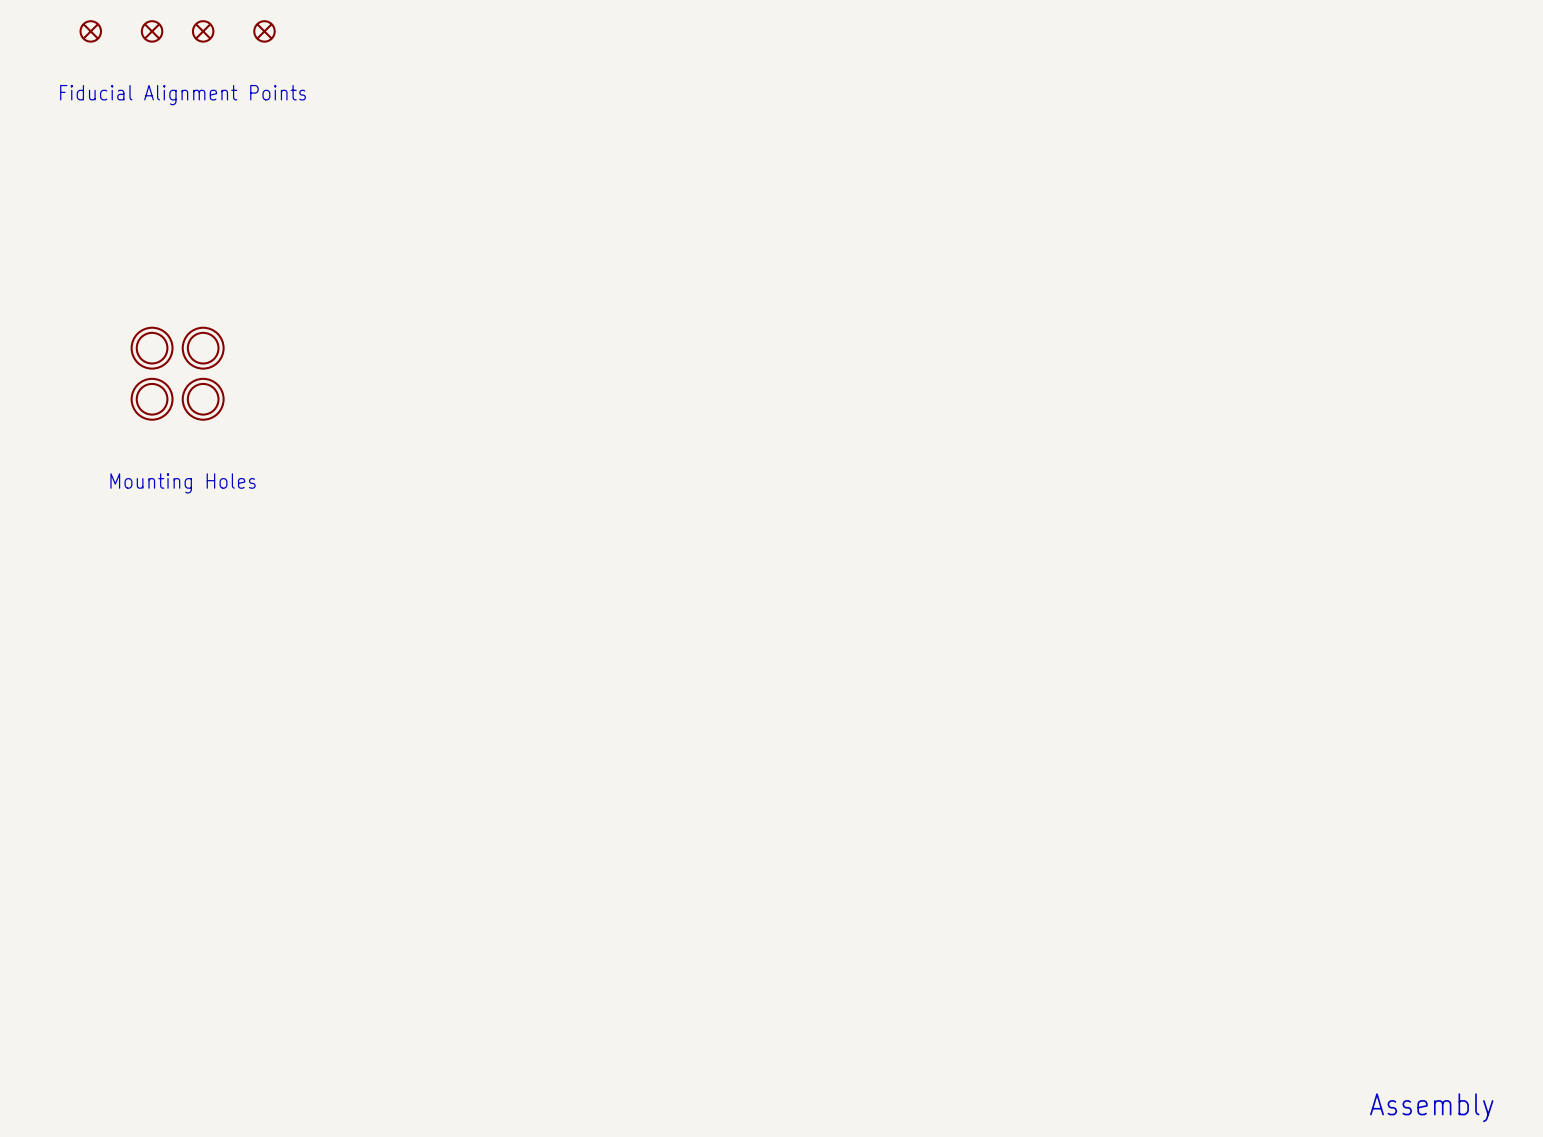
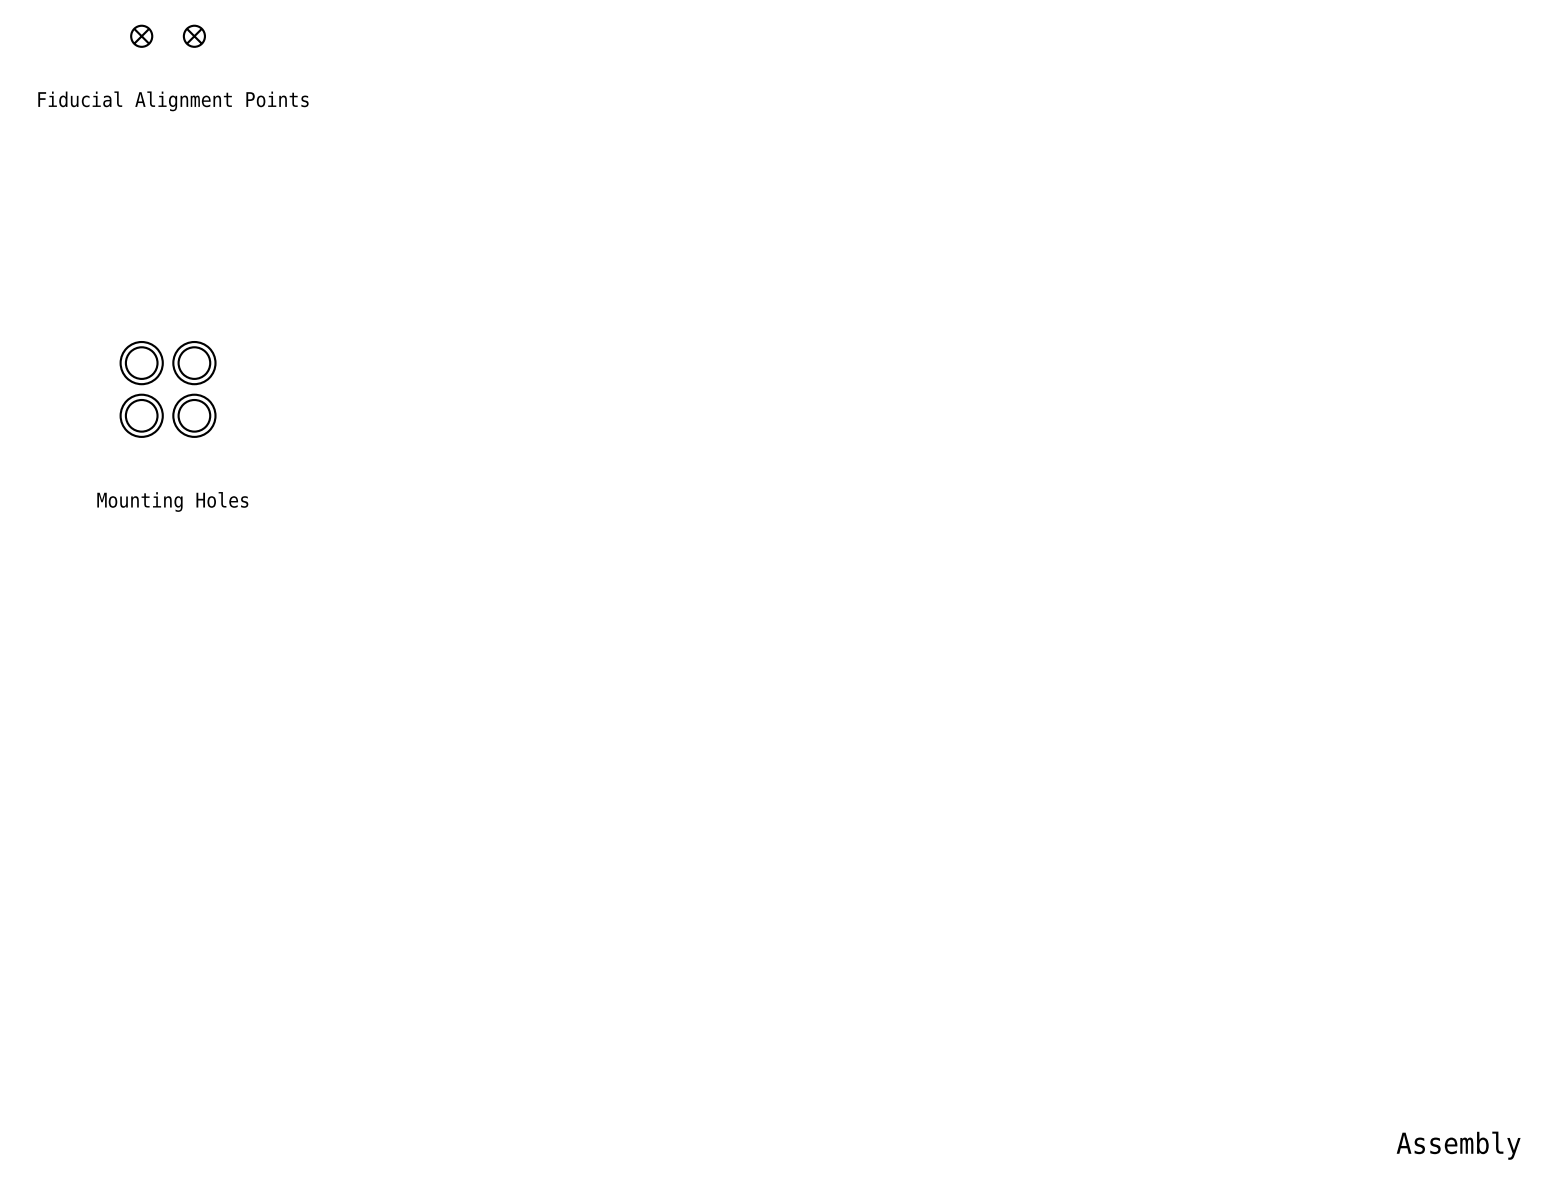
part: (90, 31) -> none
part: (264, 31) -> none

